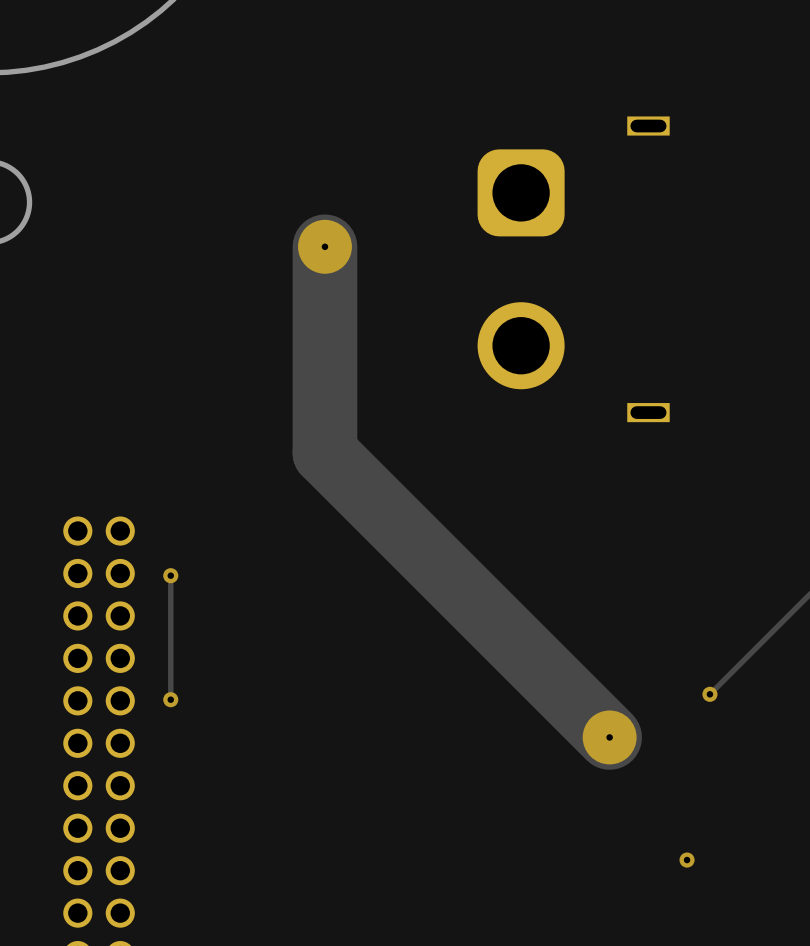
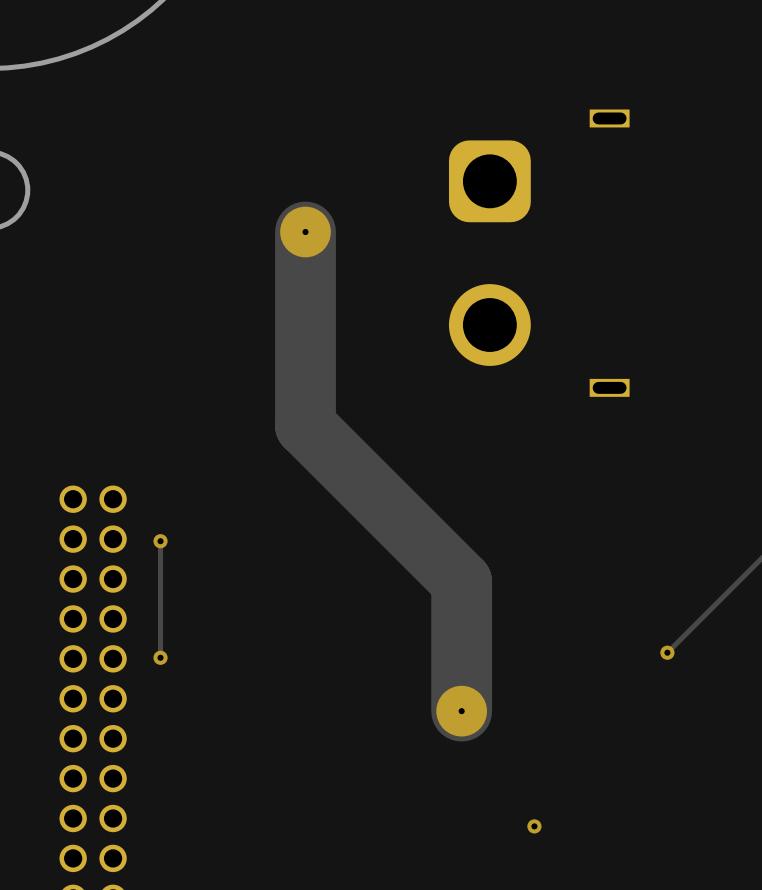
track: (491, 618) (609, 737) -> (461, 581) (461, 711)
via position: (609, 737) -> (461, 711)
via position: (687, 860) -> (534, 826)

